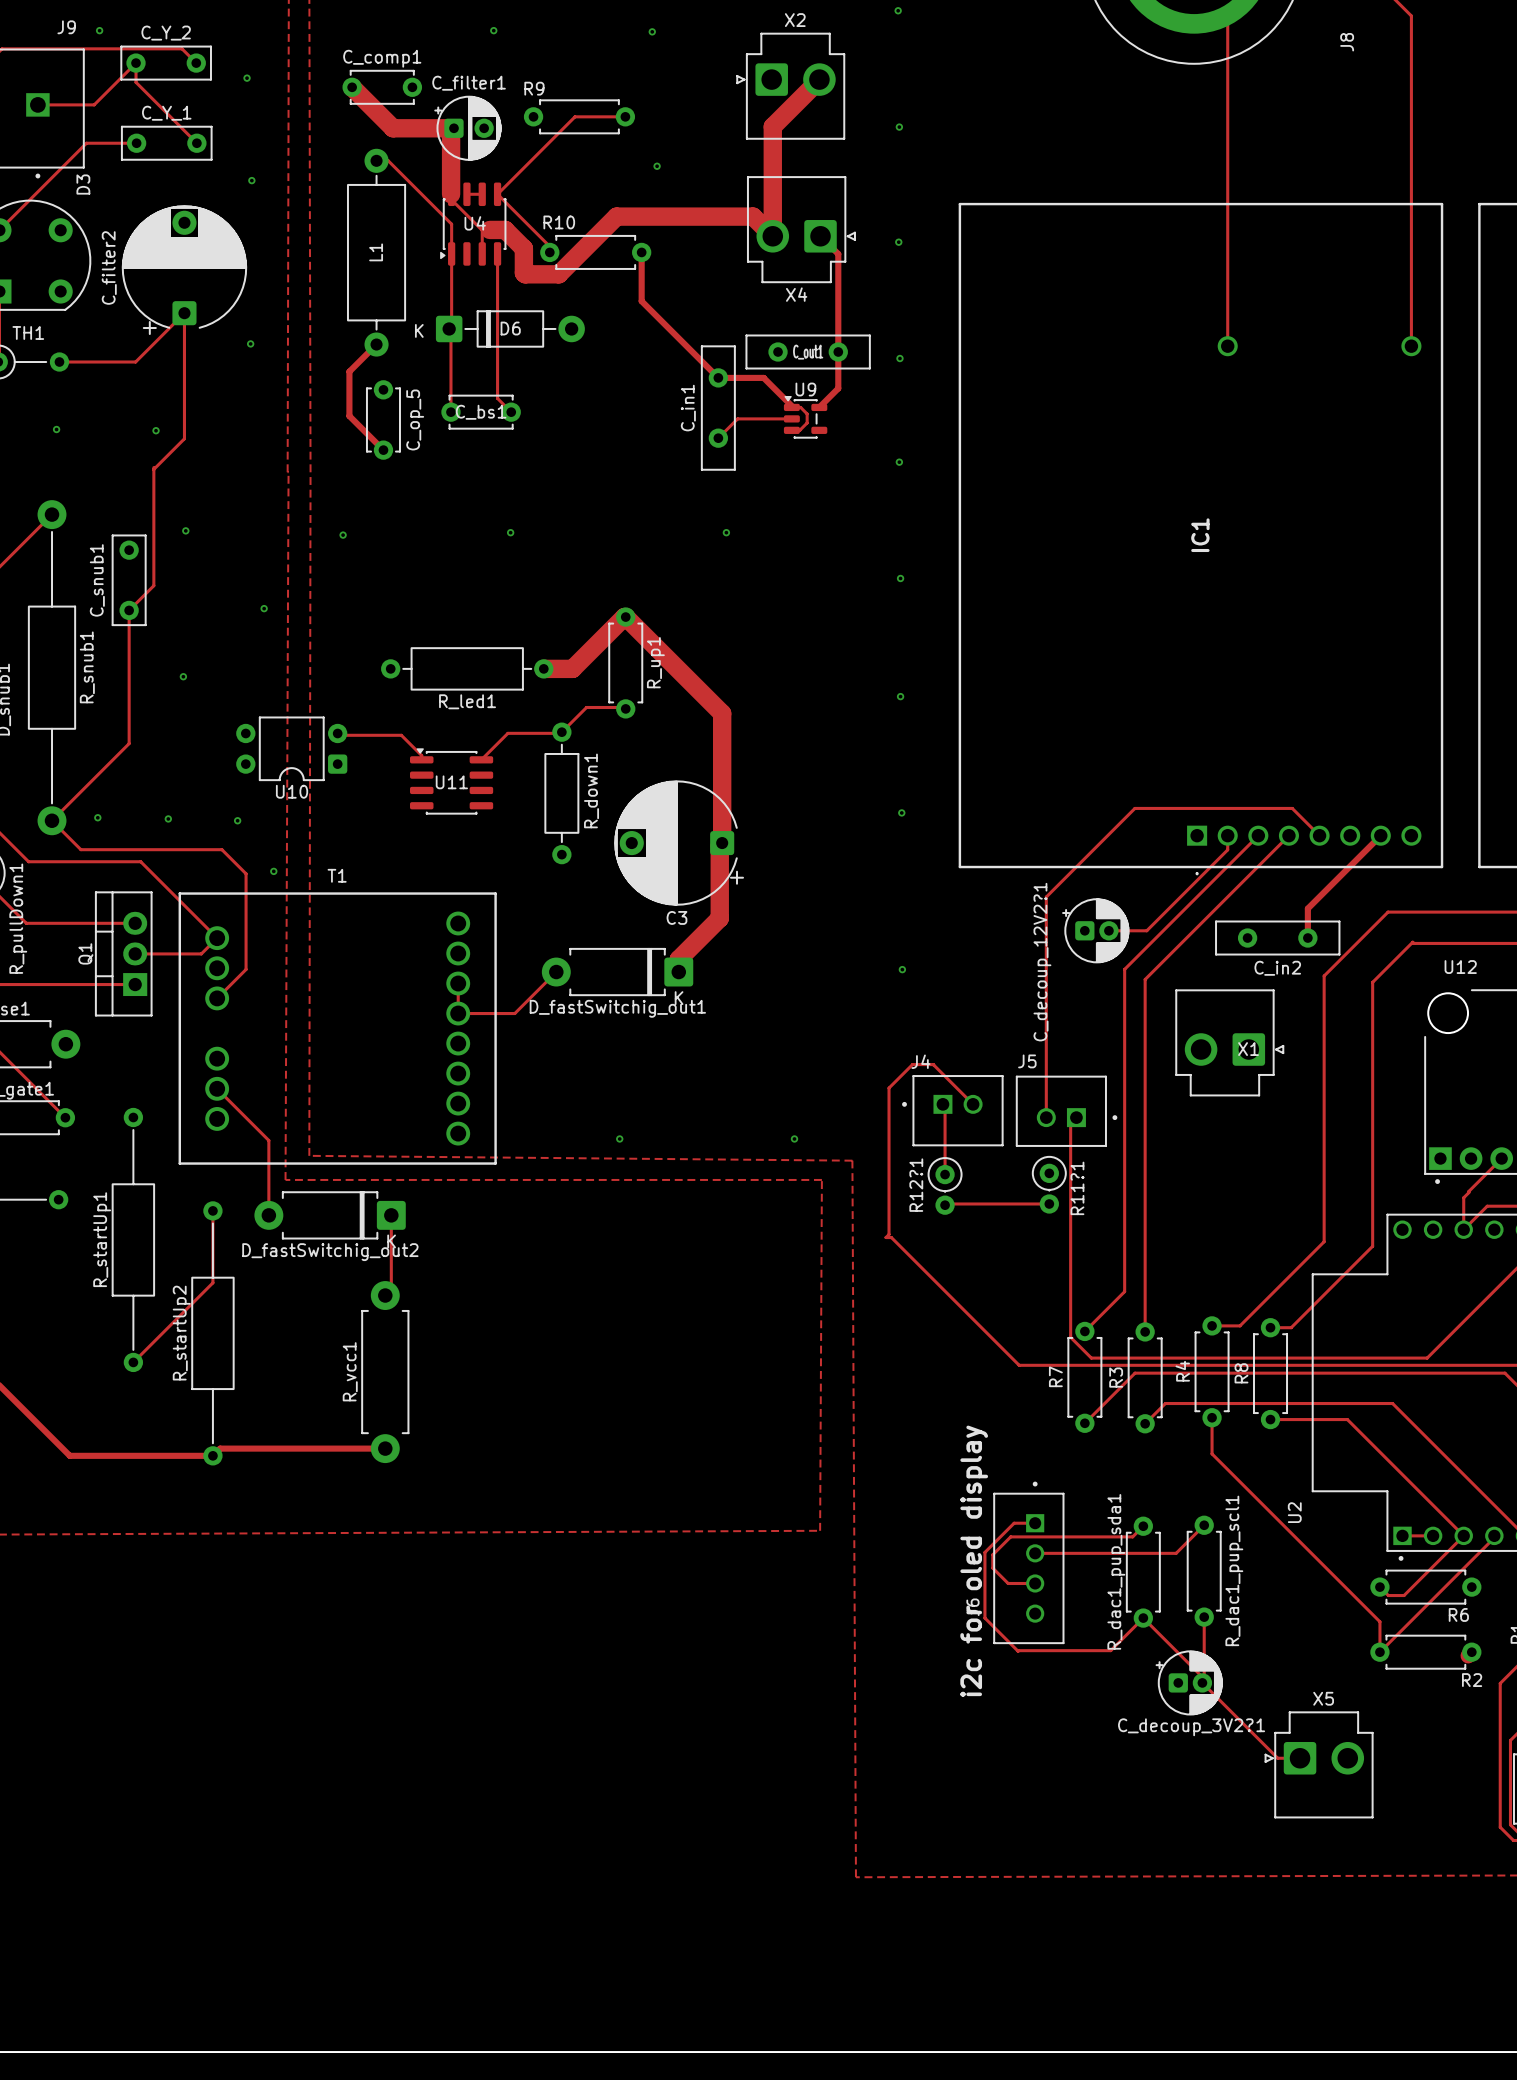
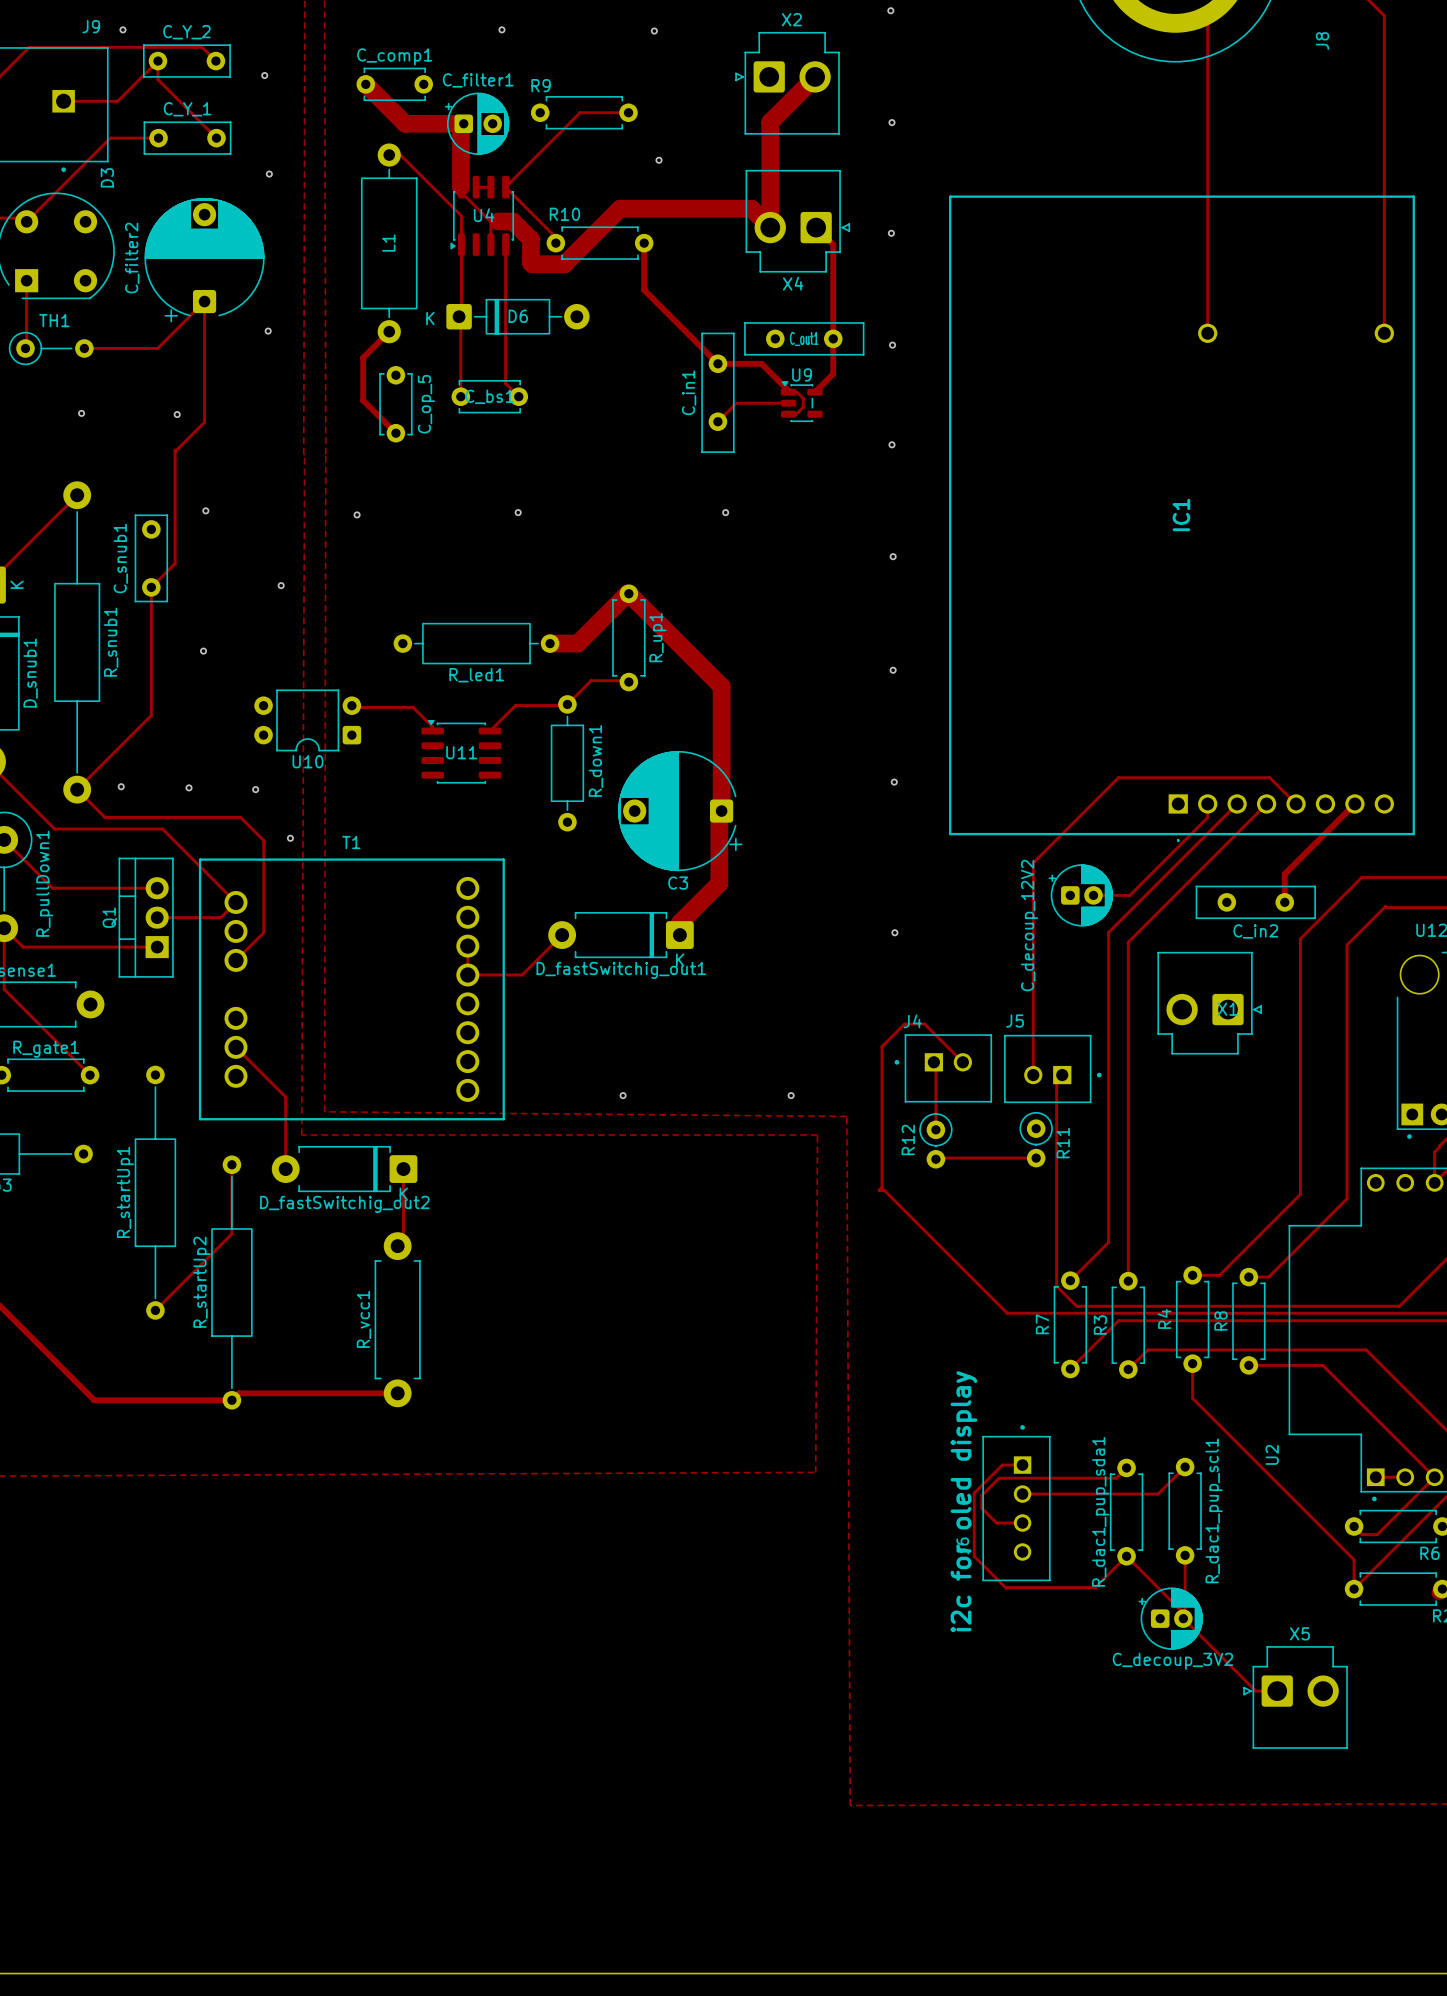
C_decoup_12V2?1 name: C_decoup_12V2?1 (1042, 962) -> C_decoup_12V2 (1029, 925)
R12?1 name: R12?1 (916, 1185) -> R12 (908, 1139)
R11?1 name: R11?1 (1077, 1188) -> R11 (1063, 1143)
C_decoup_3V2?1 name: C_decoup_3V2?1 (1191, 1727) -> C_decoup_3V2 (1172, 1661)

